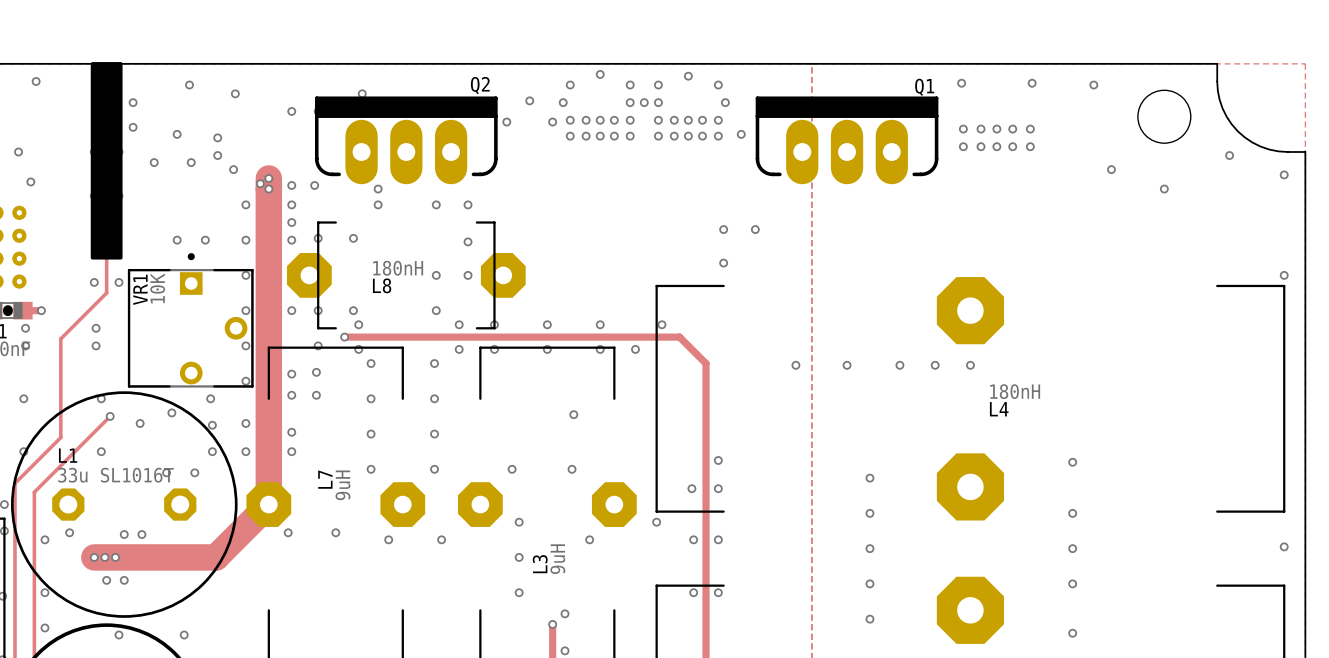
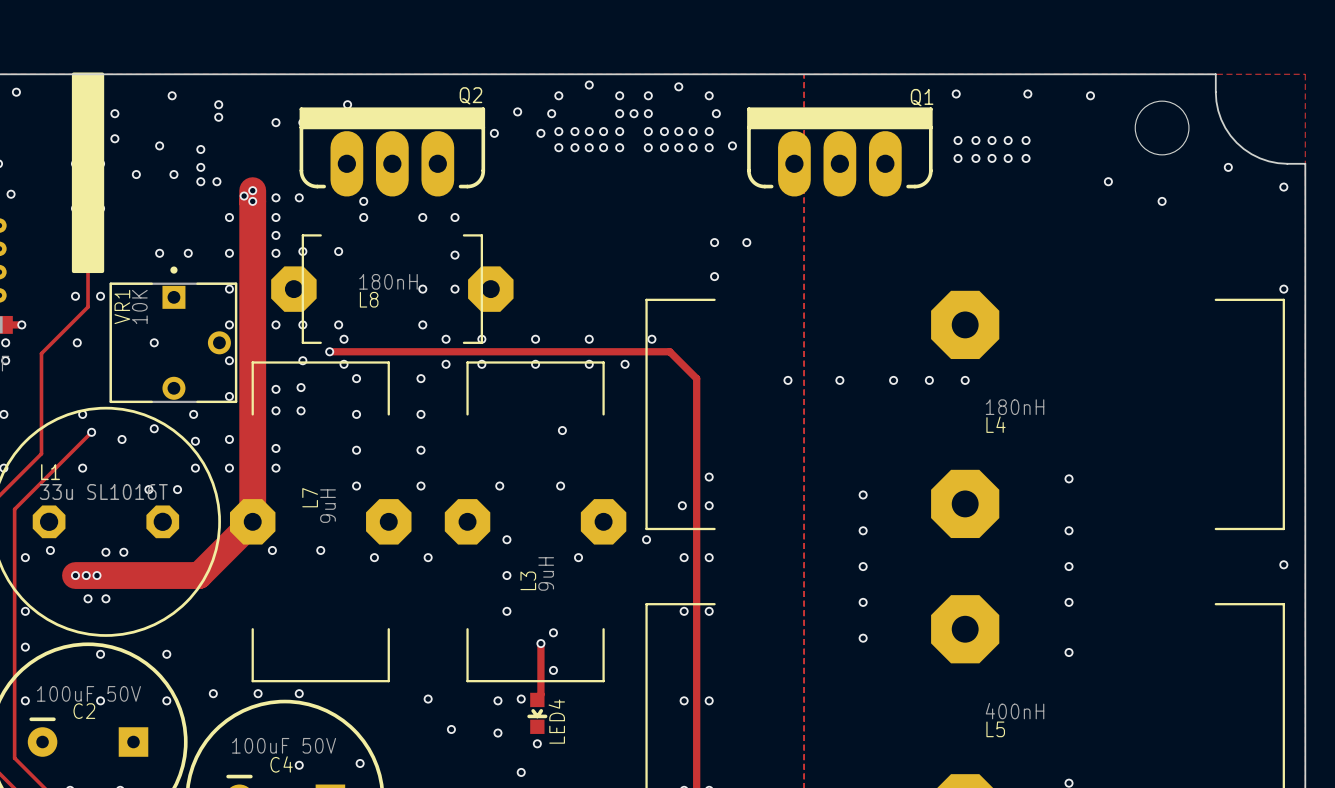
via: none -> (218, 117)
via: none -> (200, 181)
via position: (96, 345) -> (154, 342)

